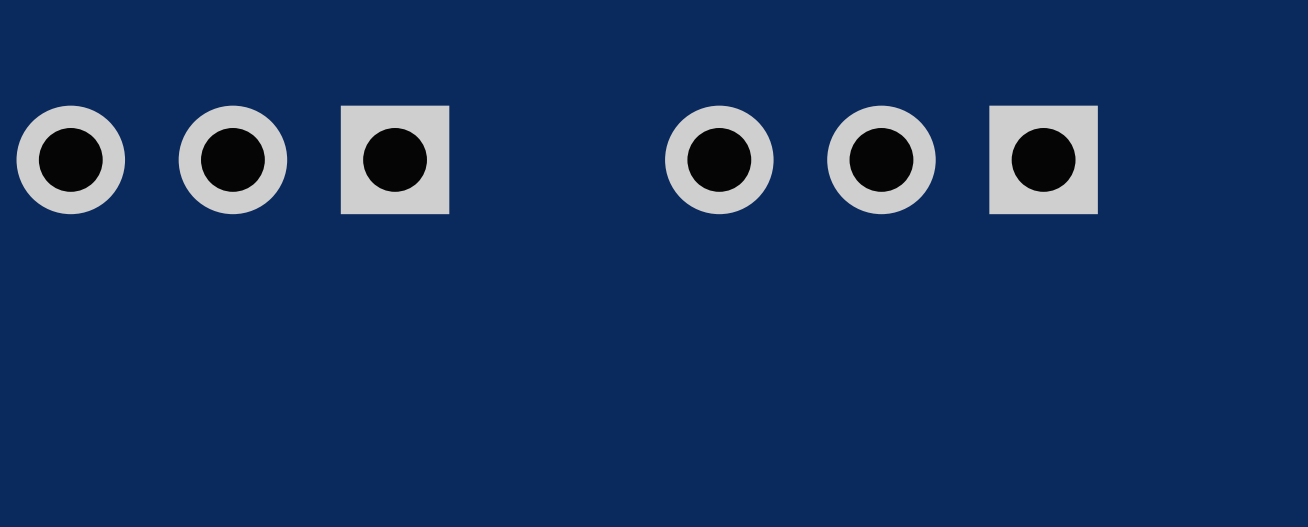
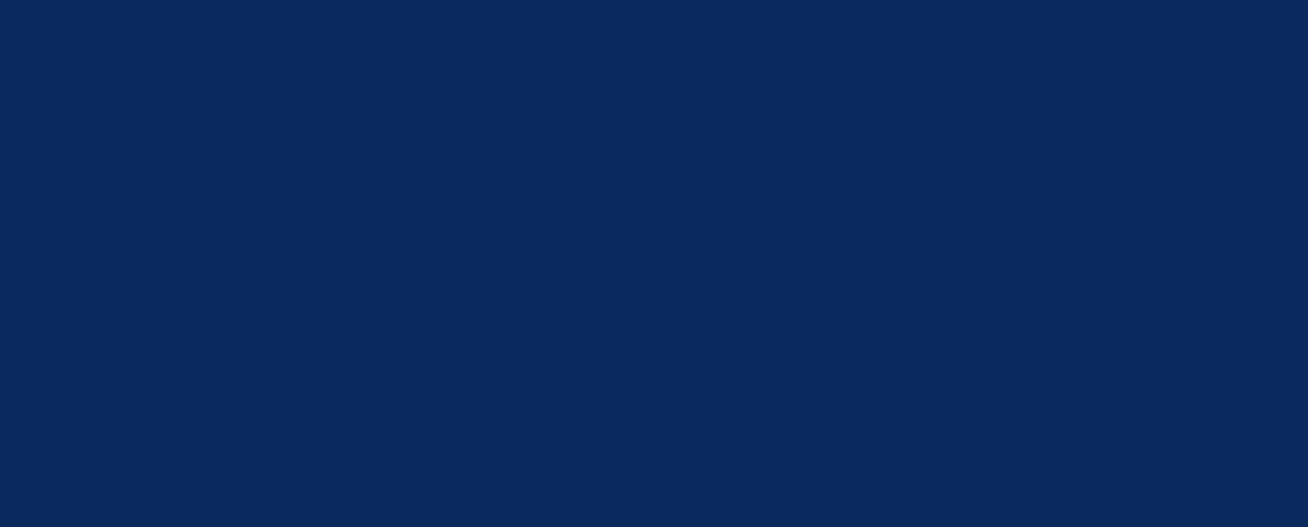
part: (232, 159) -> none
part: (881, 159) -> none

